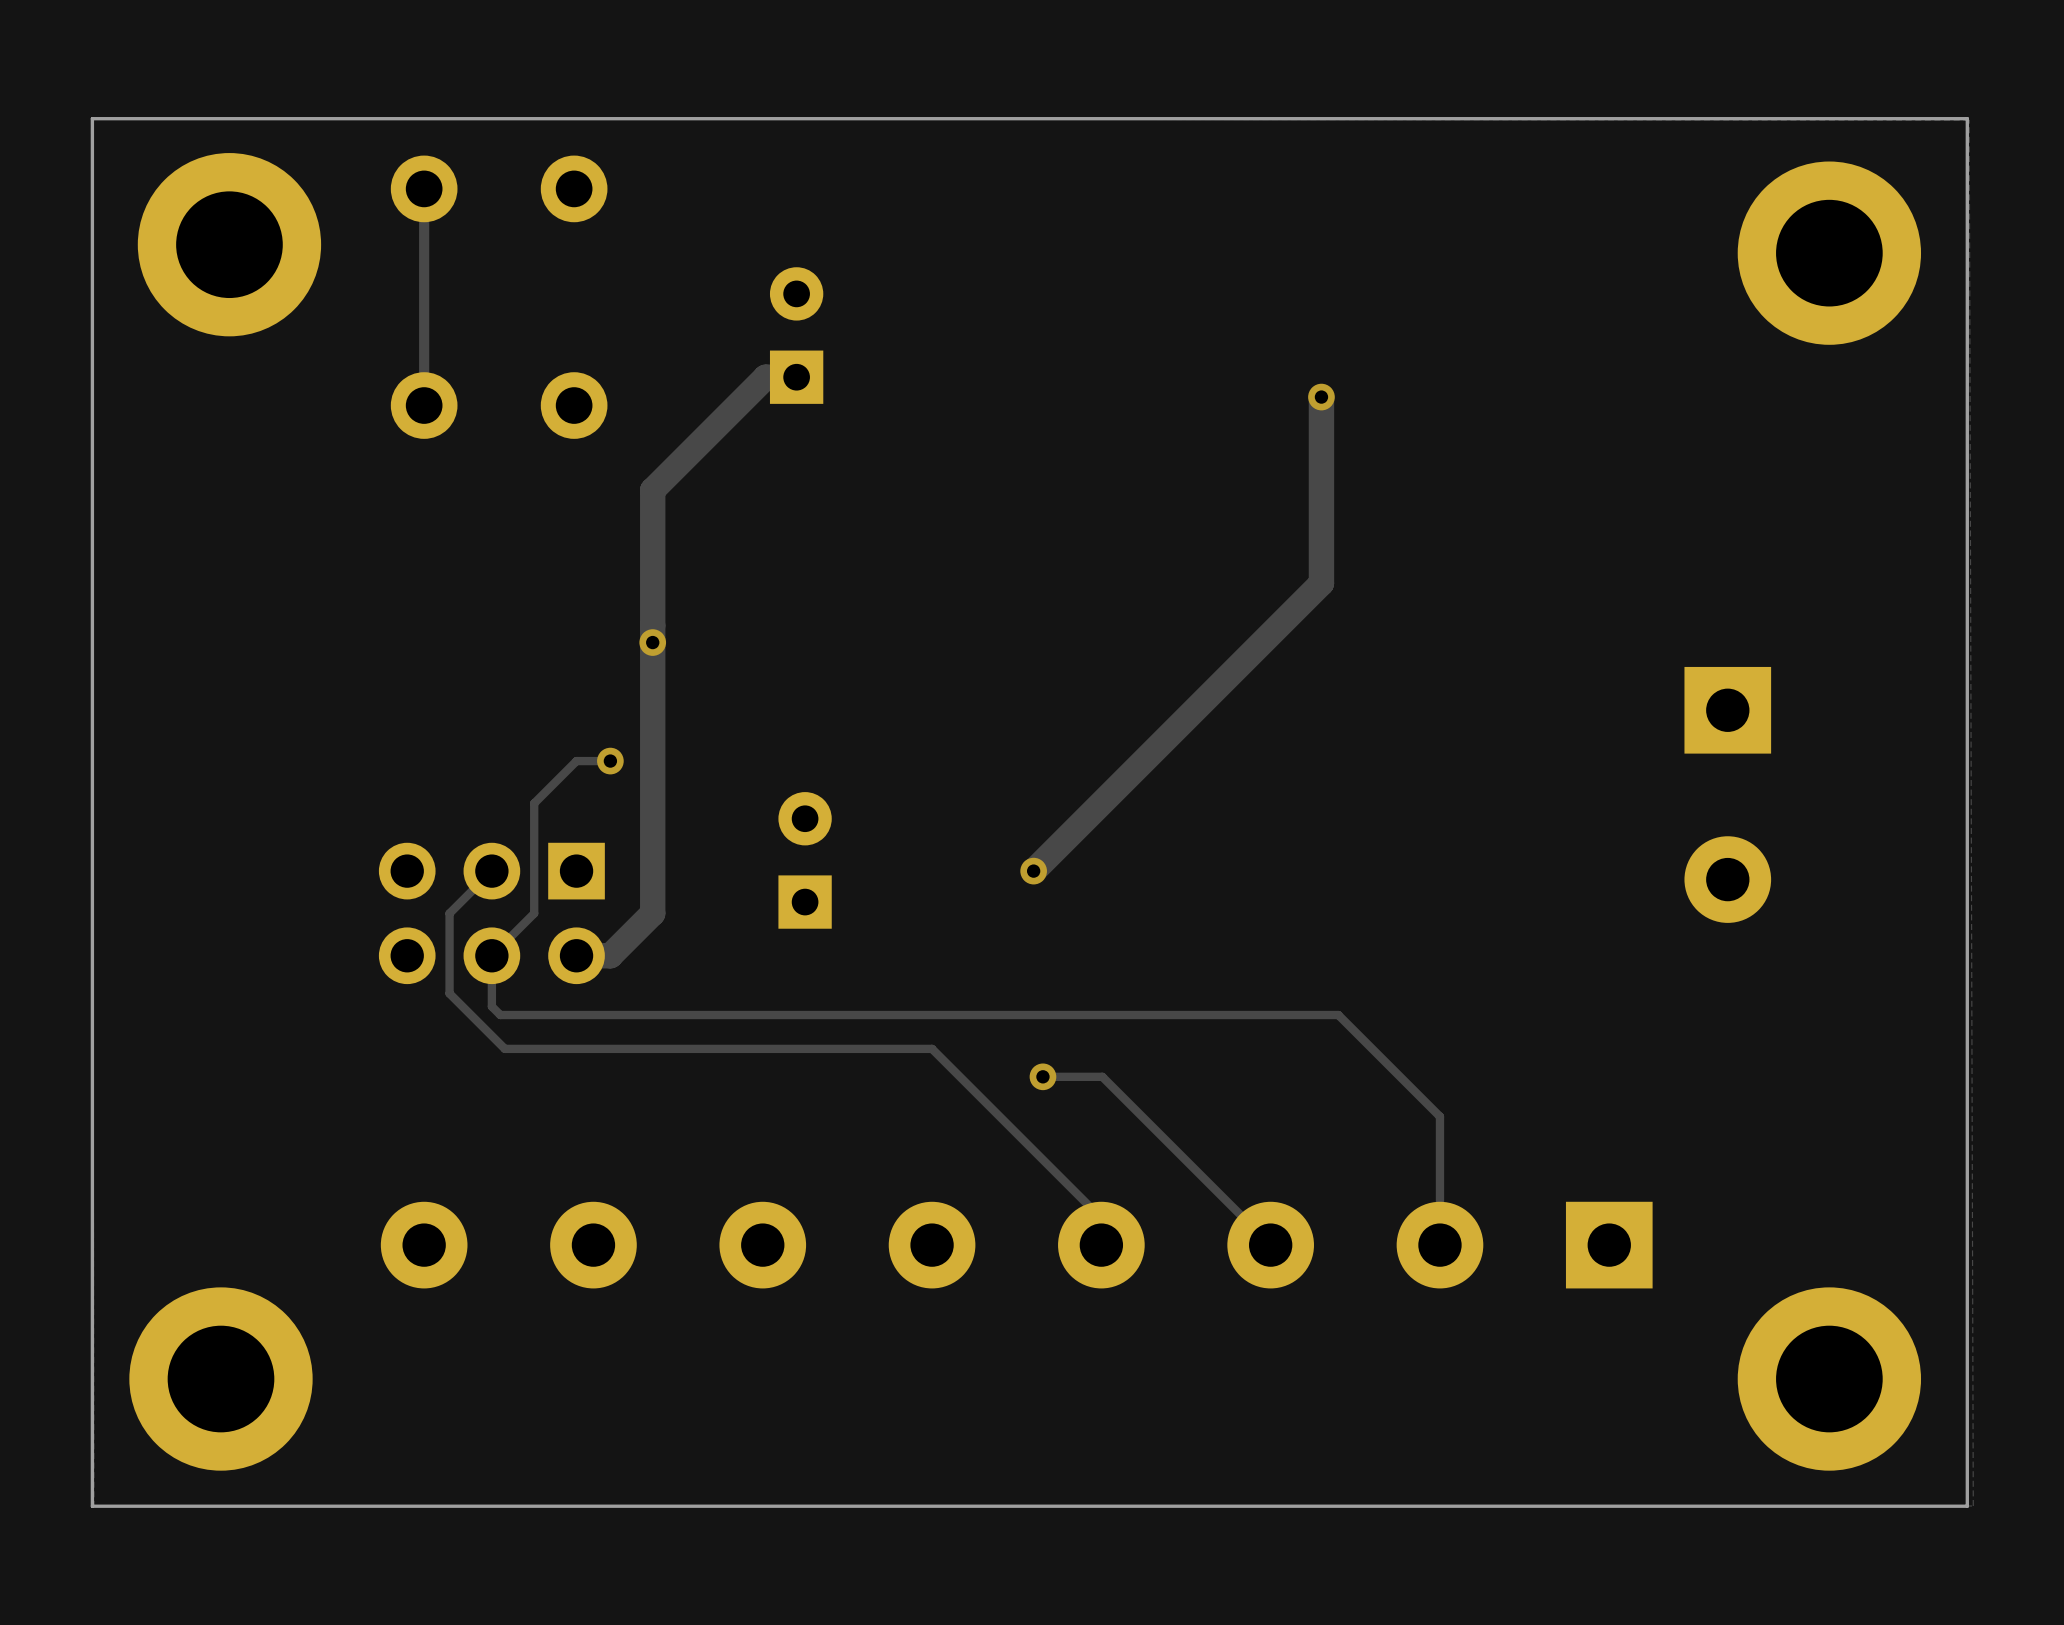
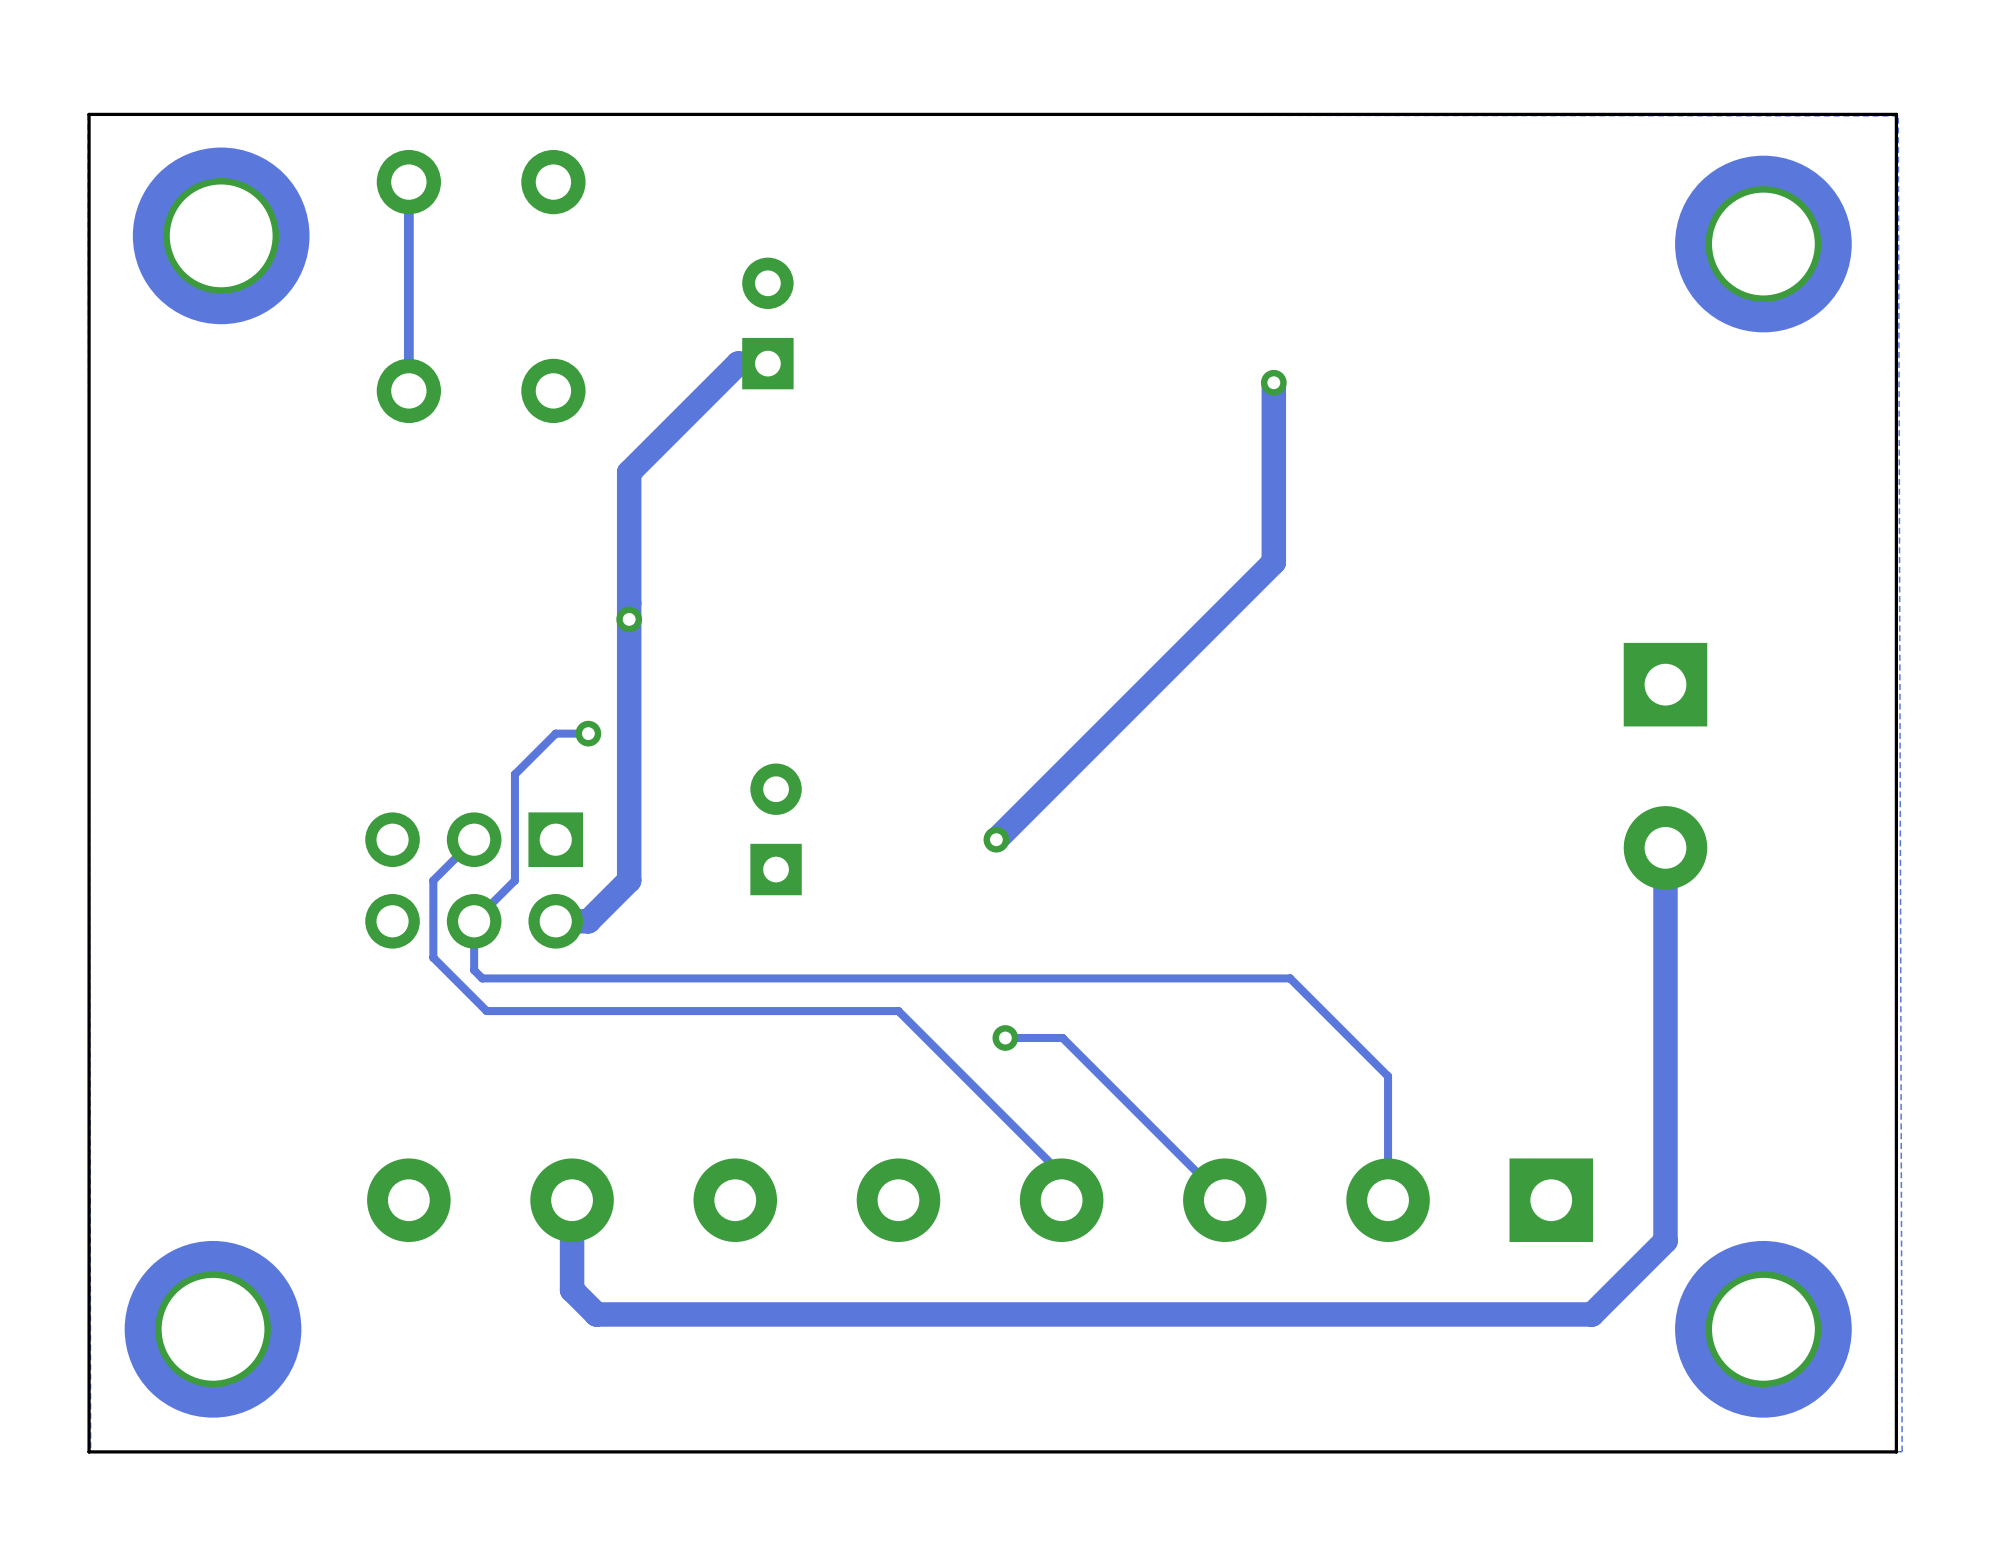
track: none -> (1665, 847) (1665, 1241) (1592, 1314) (596, 1314) (572, 1289) (572, 1200)

